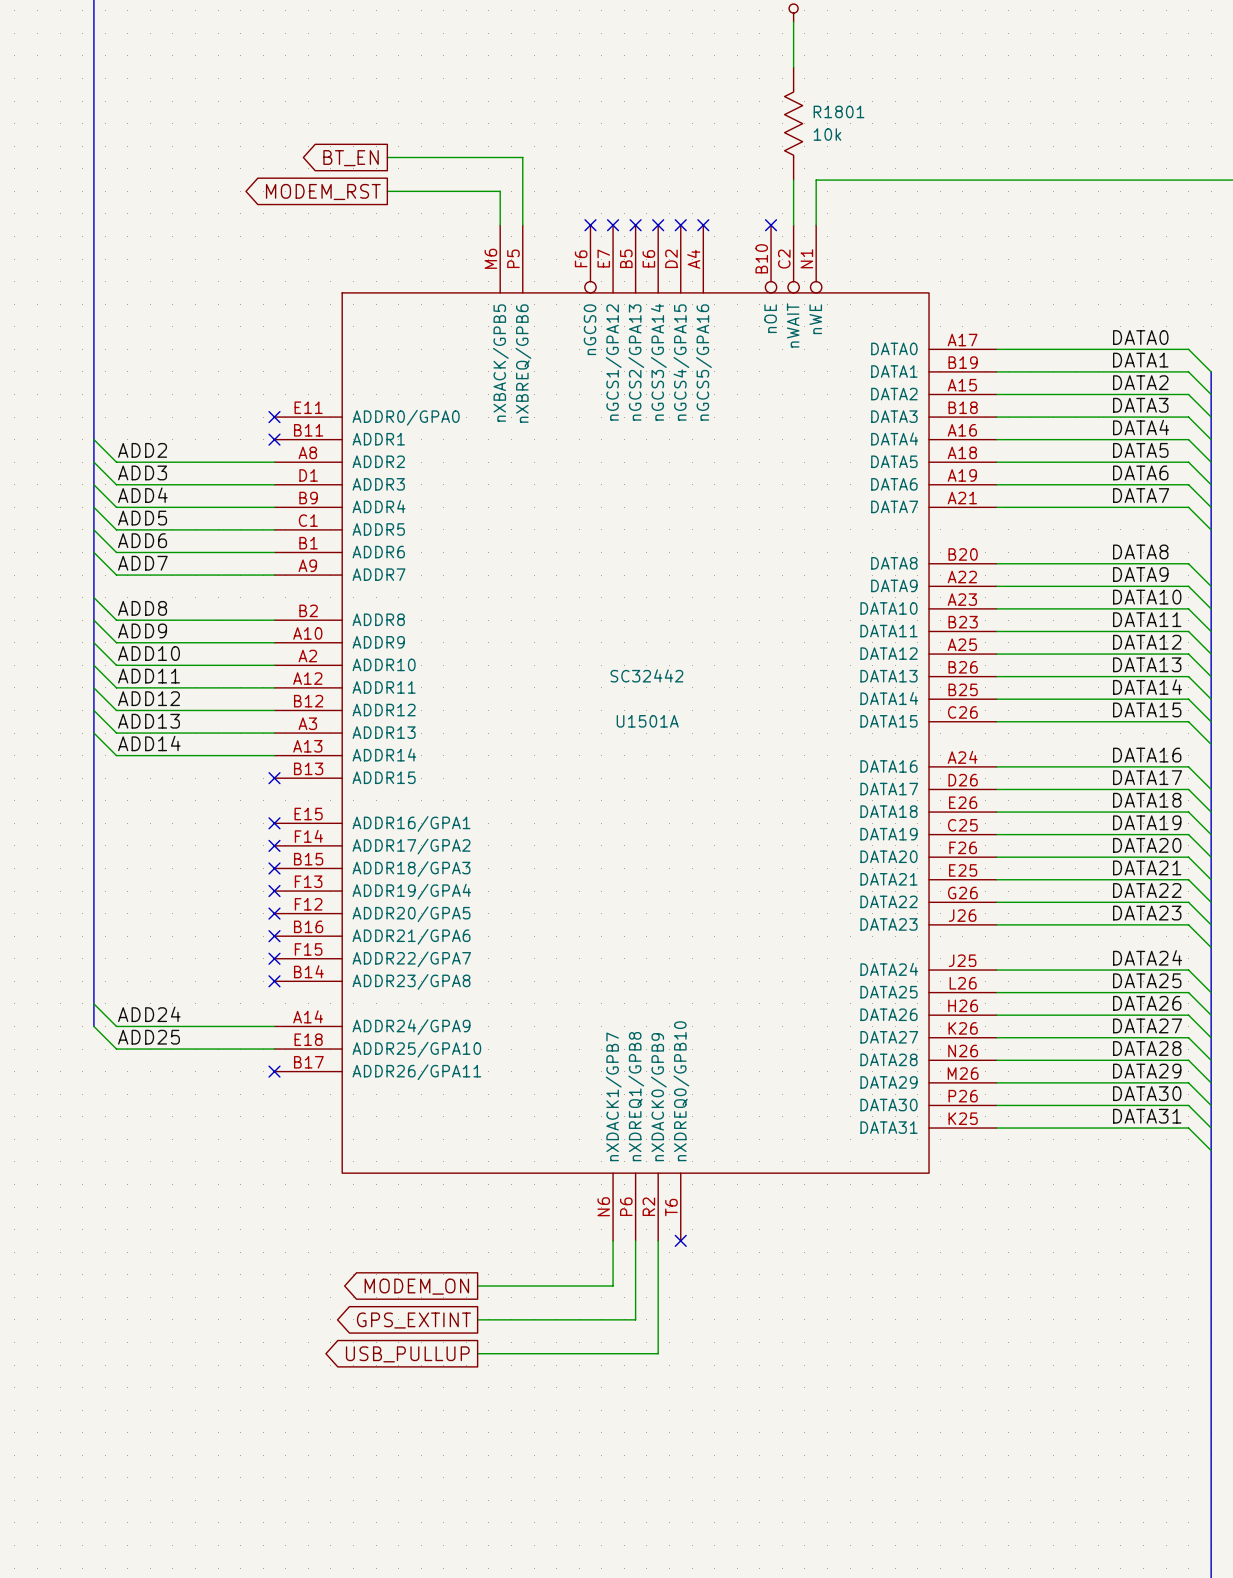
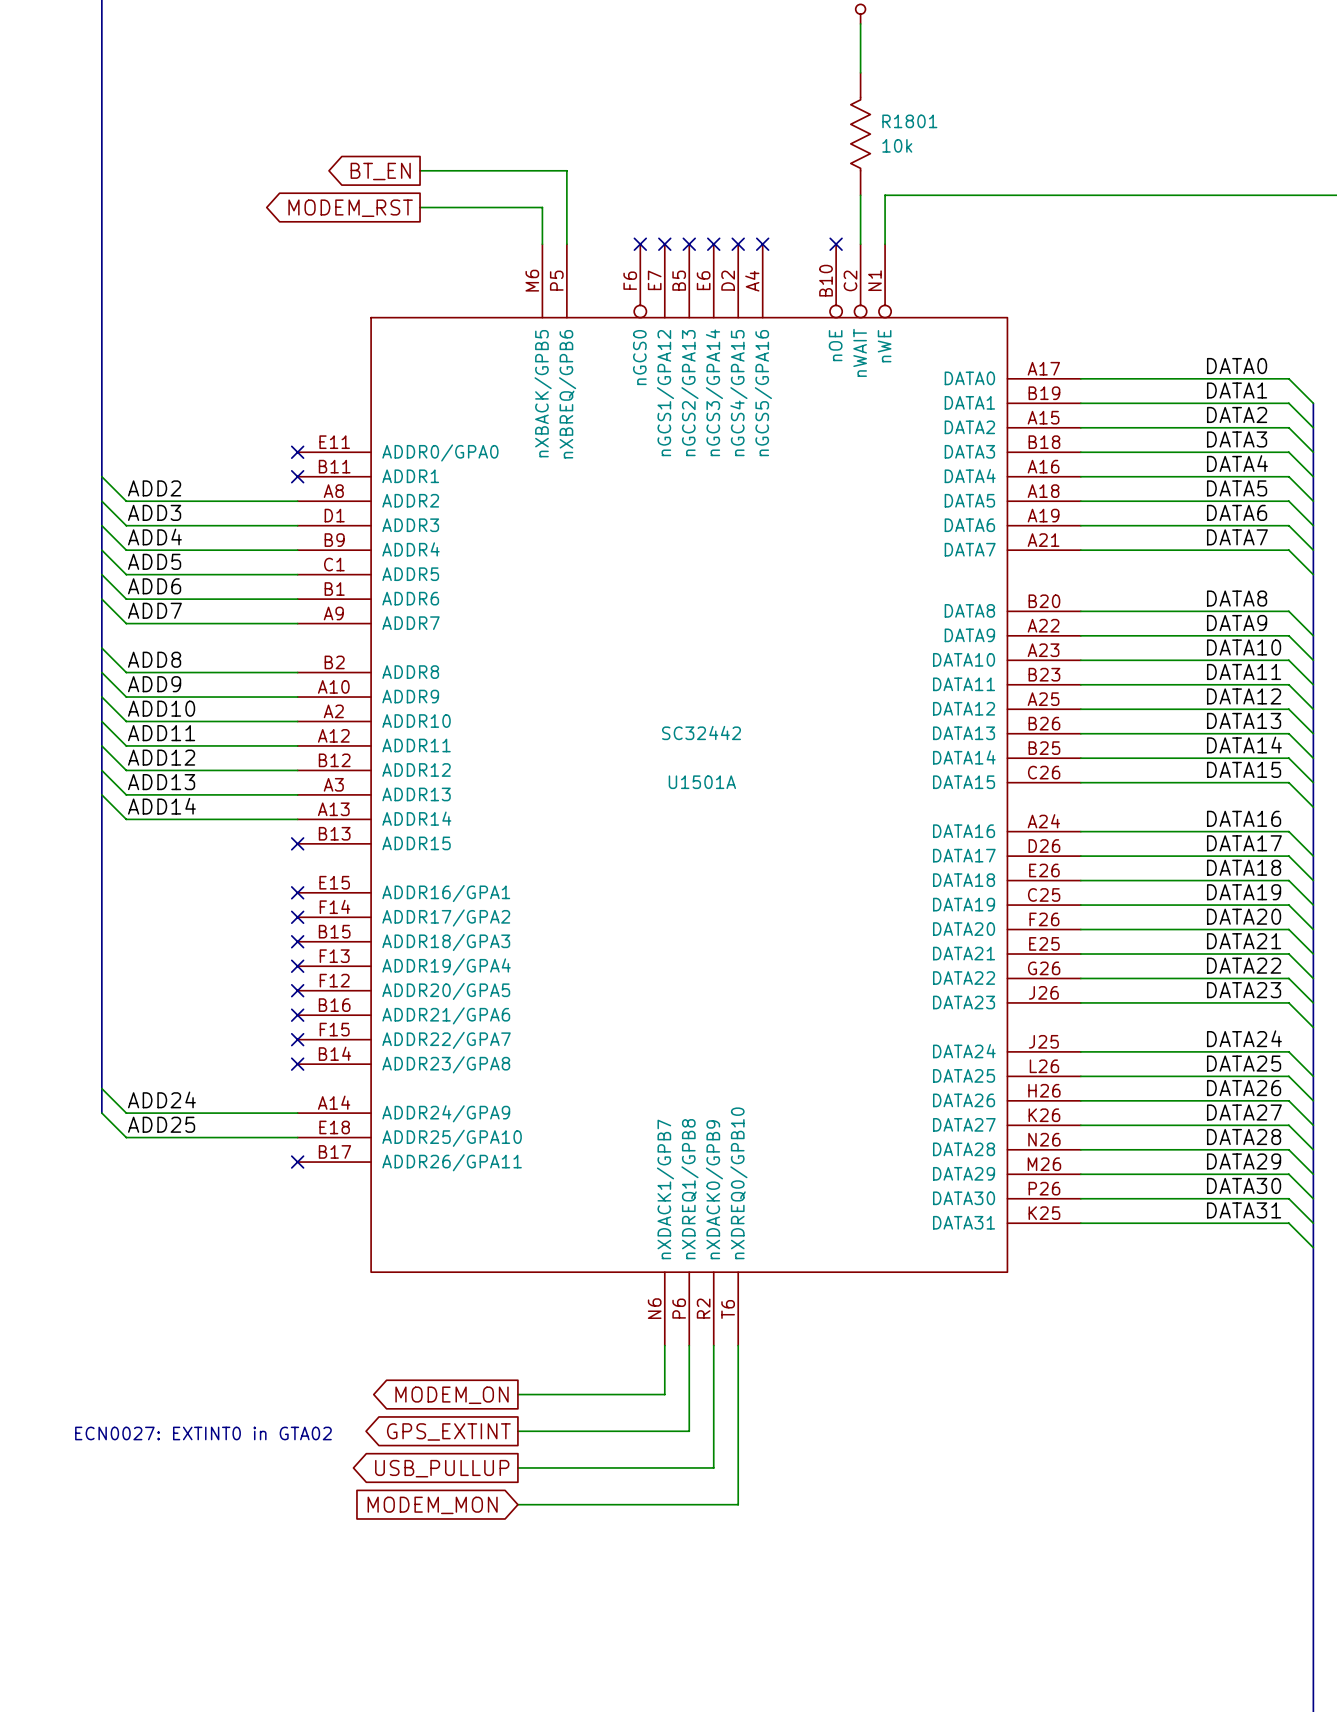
wire: none -> (738, 1345) (738, 1504) (517, 1504)
no-connect mark: (680, 1240) -> none
text: none -> ECN0027: EXTINT0 in GTA02 (203, 1433)
global label: none -> MODEM_MON (432, 1505)

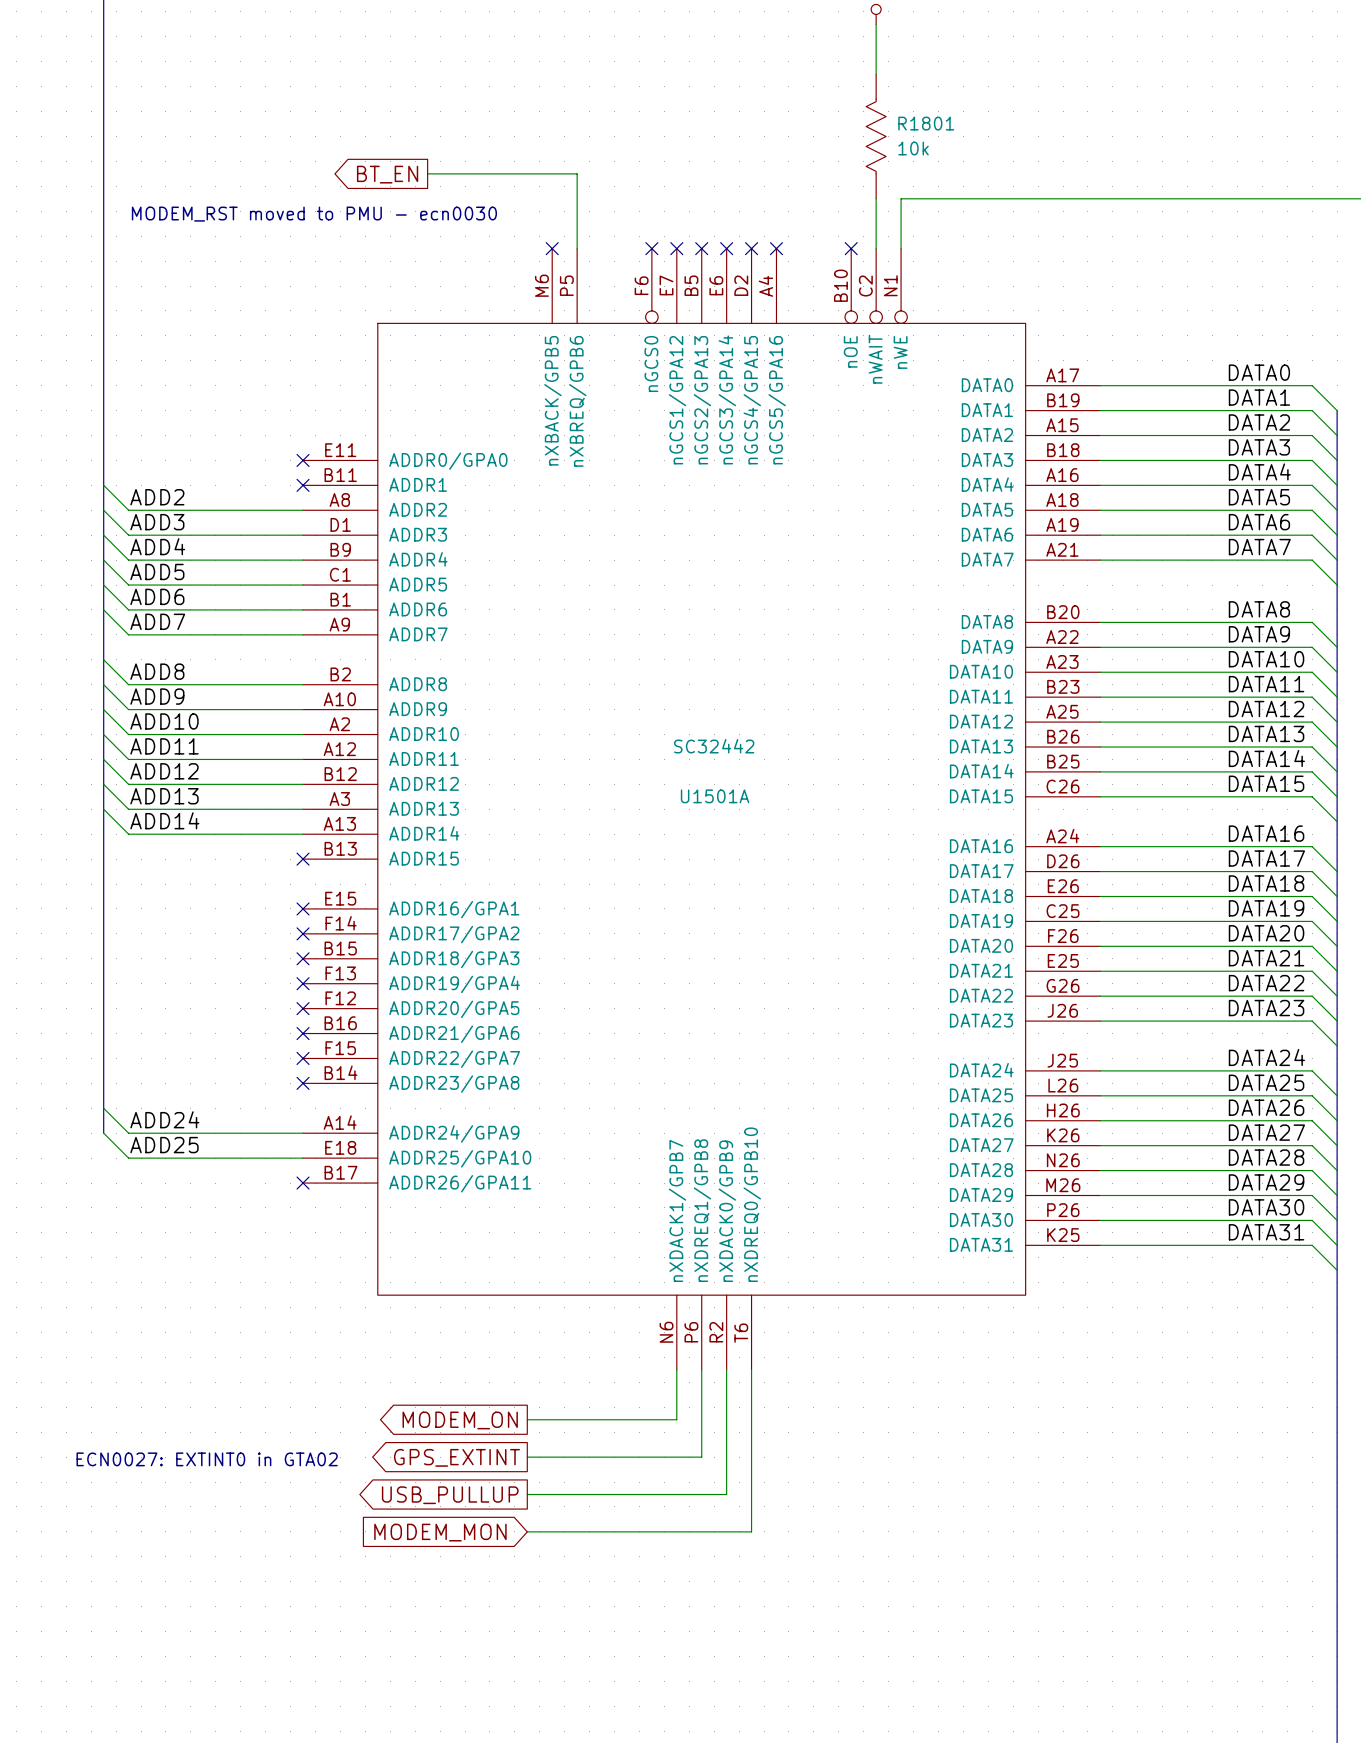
wire: (420, 207) (542, 207) (542, 244) -> none
global label: MODEM_RST (350, 208) -> none
text: none -> MODEM_RST moved to PMU - ecn0030 (314, 214)
no-connect mark: none -> (552, 248)

